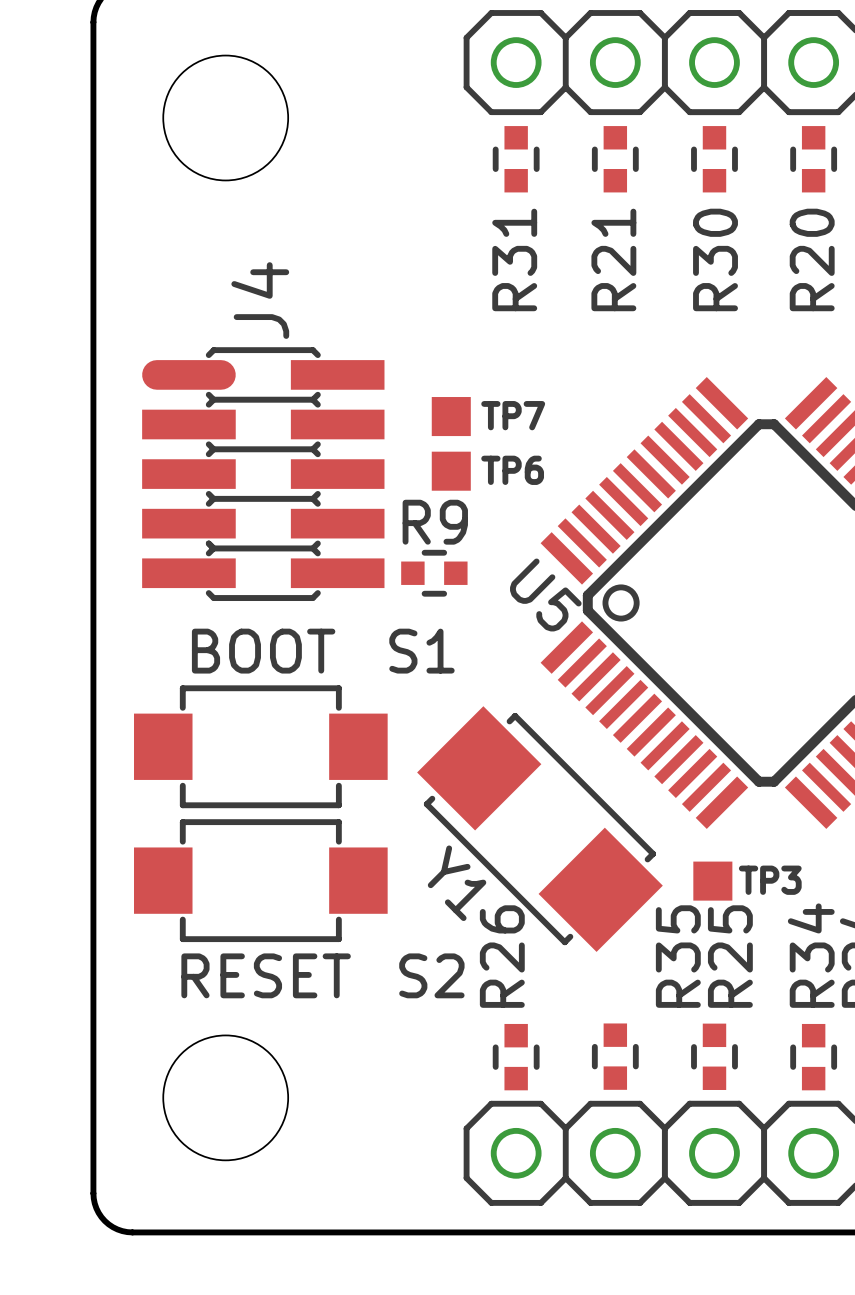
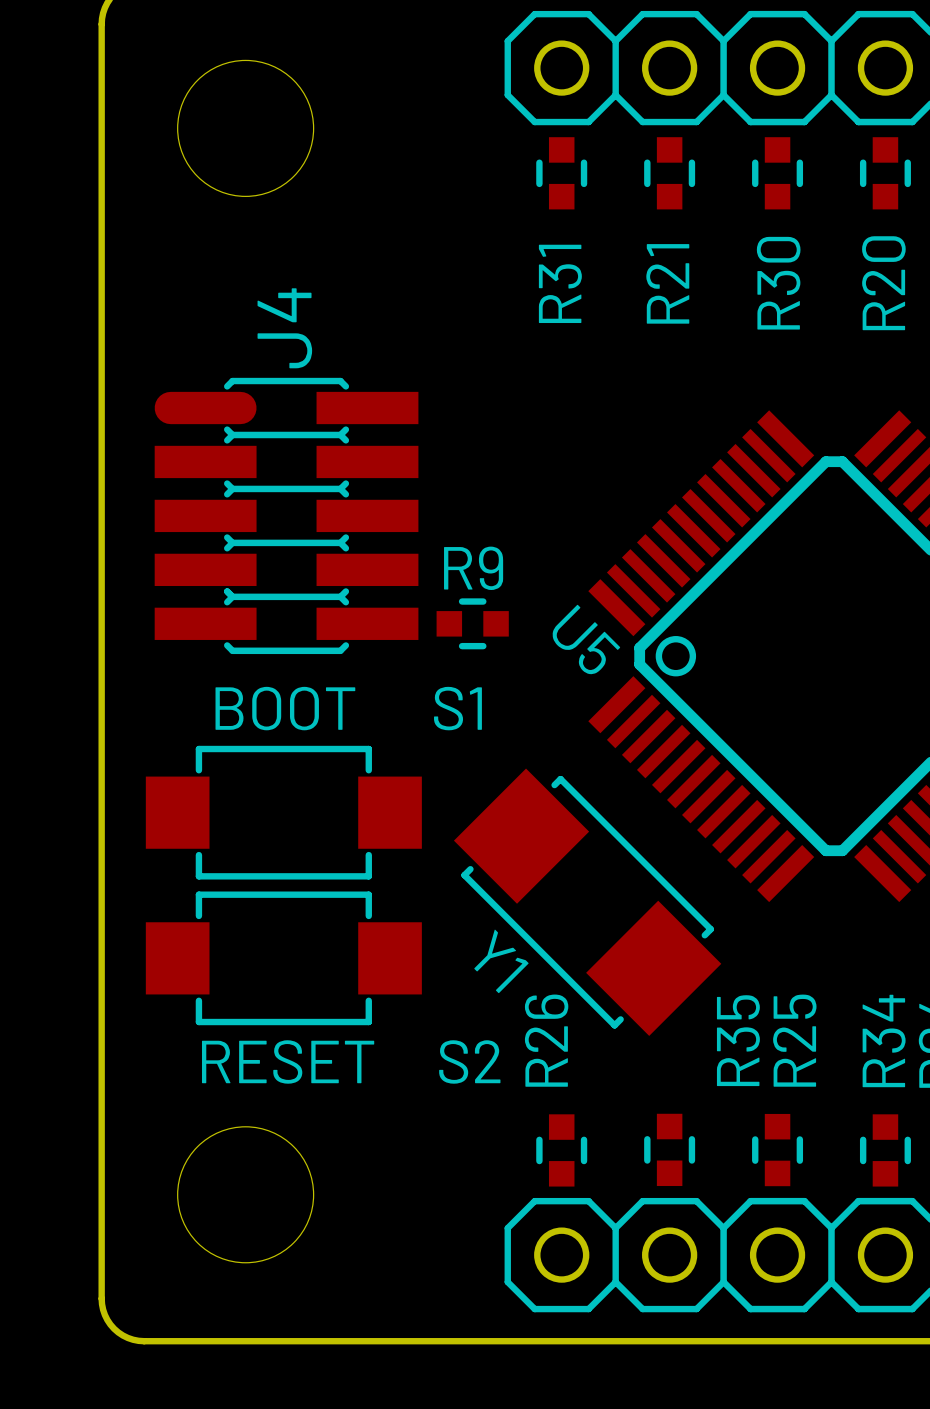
TP7: (451, 416) -> none
TP6: (451, 471) -> none
TP3: (712, 881) -> none

